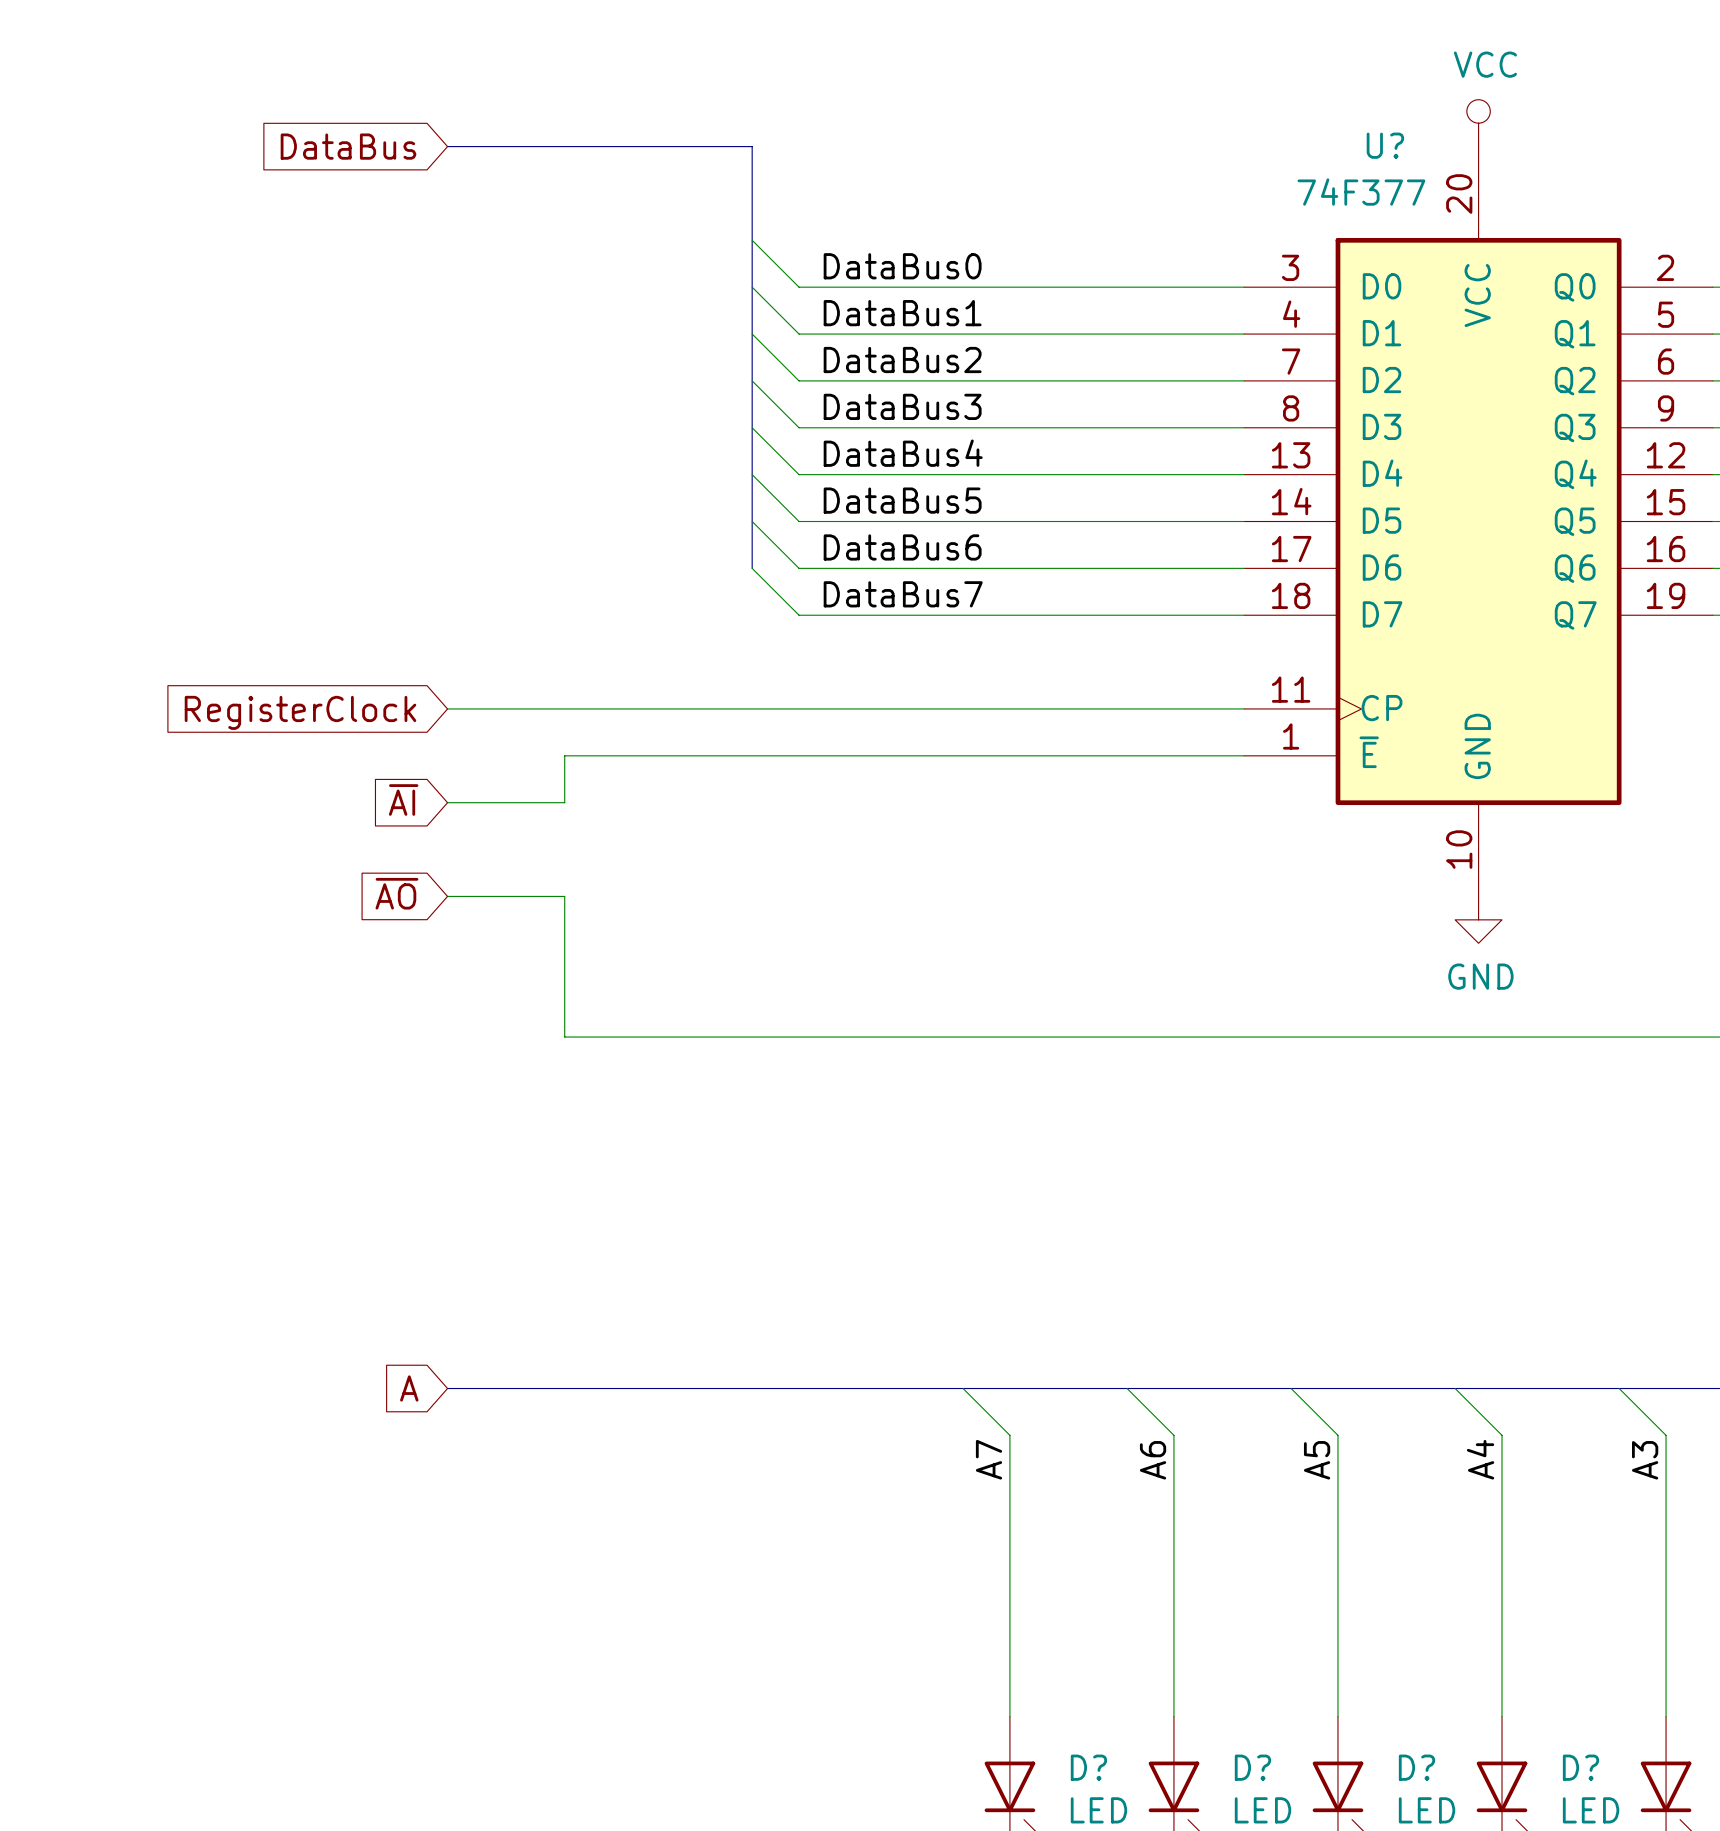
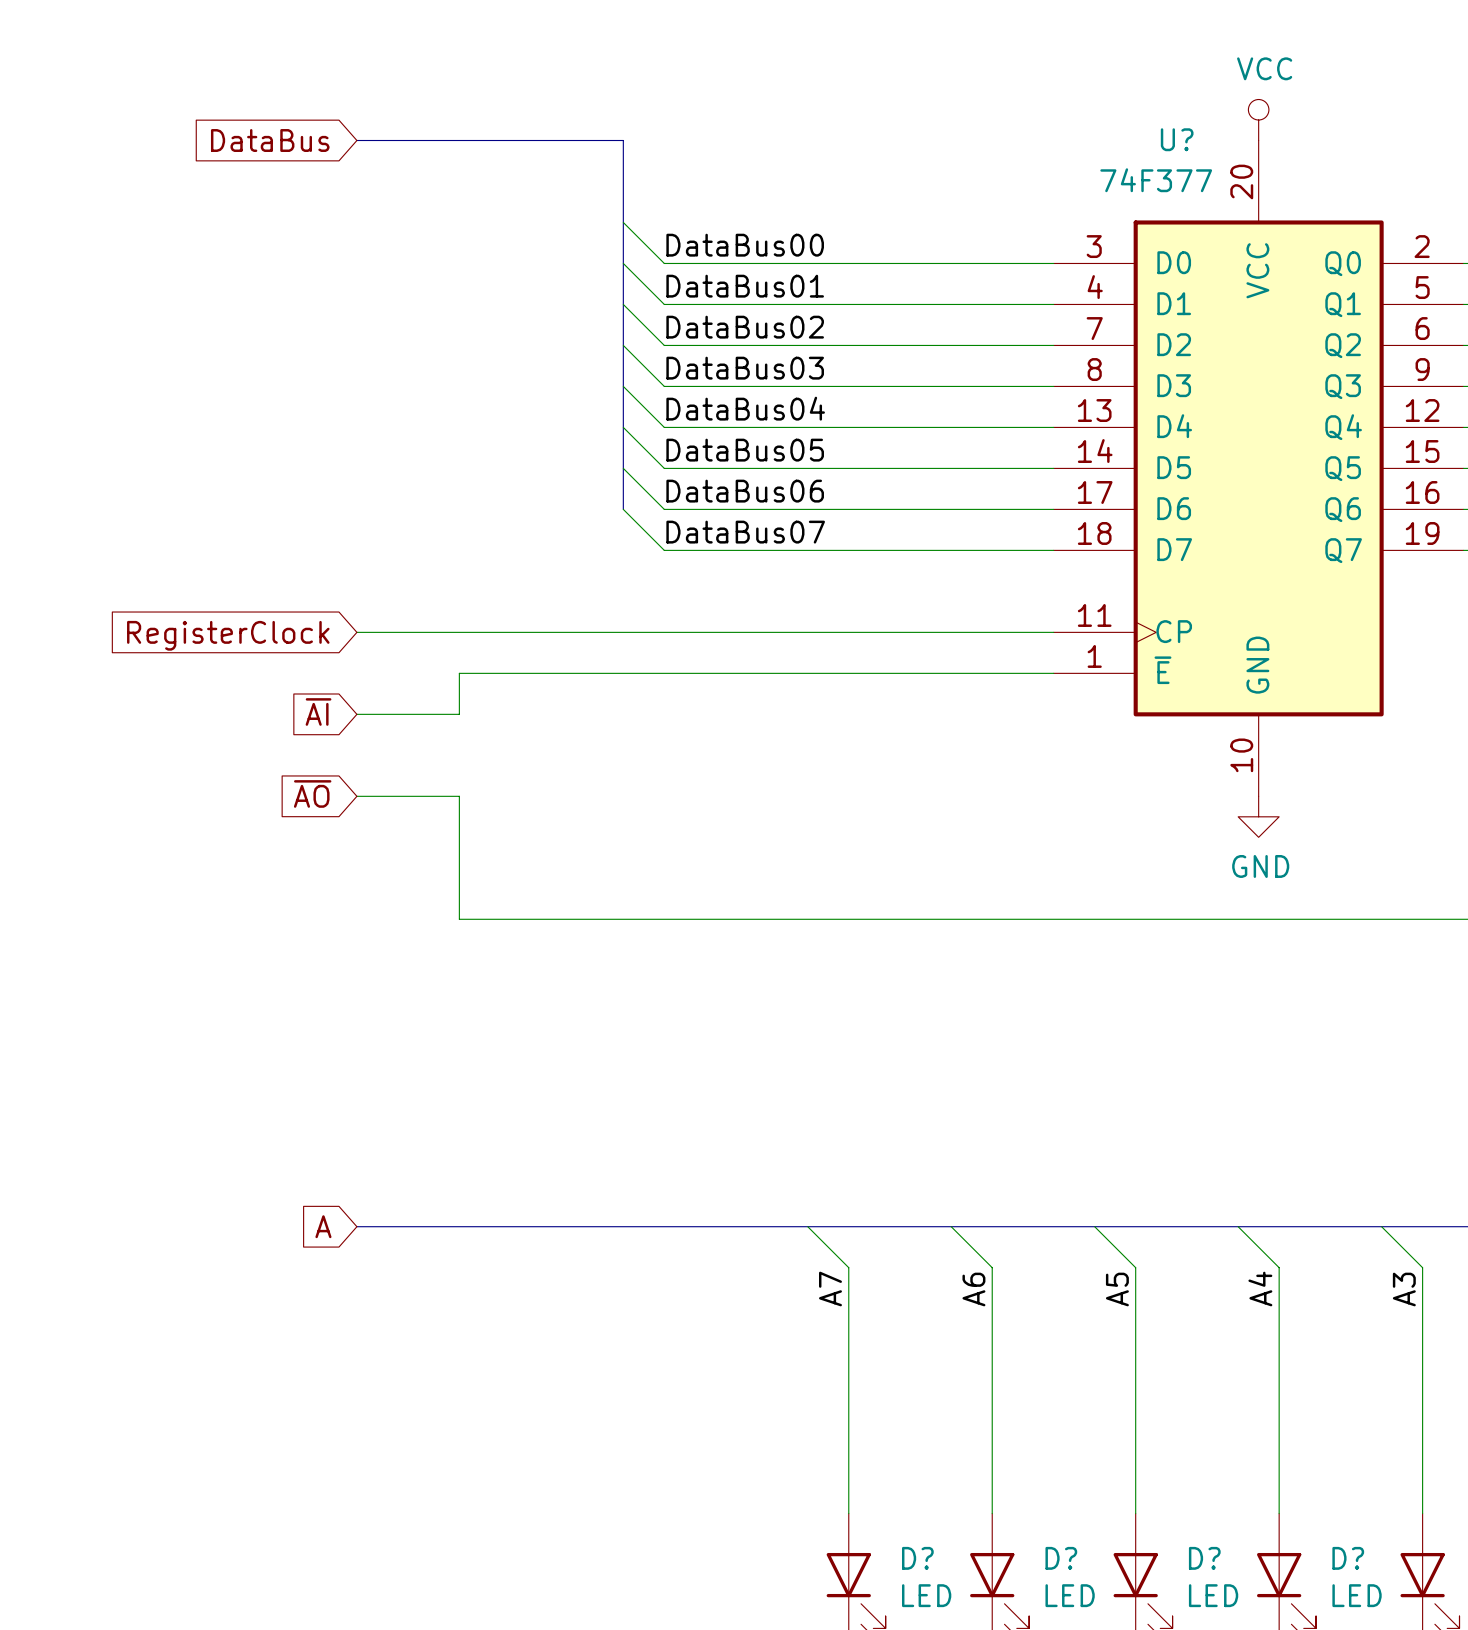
label: DataBus0 (902, 266) -> DataBus00 (745, 245)
label: DataBus1 (902, 313) -> DataBus01 (745, 286)
label: DataBus2 (902, 360) -> DataBus02 (745, 327)
label: DataBus3 (902, 406) -> DataBus03 (745, 368)
label: DataBus4 (903, 453) -> DataBus04 (745, 408)
label: DataBus5 (902, 500) -> DataBus05 (745, 450)
label: DataBus6 (902, 547) -> DataBus06 (745, 491)
label: DataBus7 (903, 594) -> DataBus07 (745, 532)

